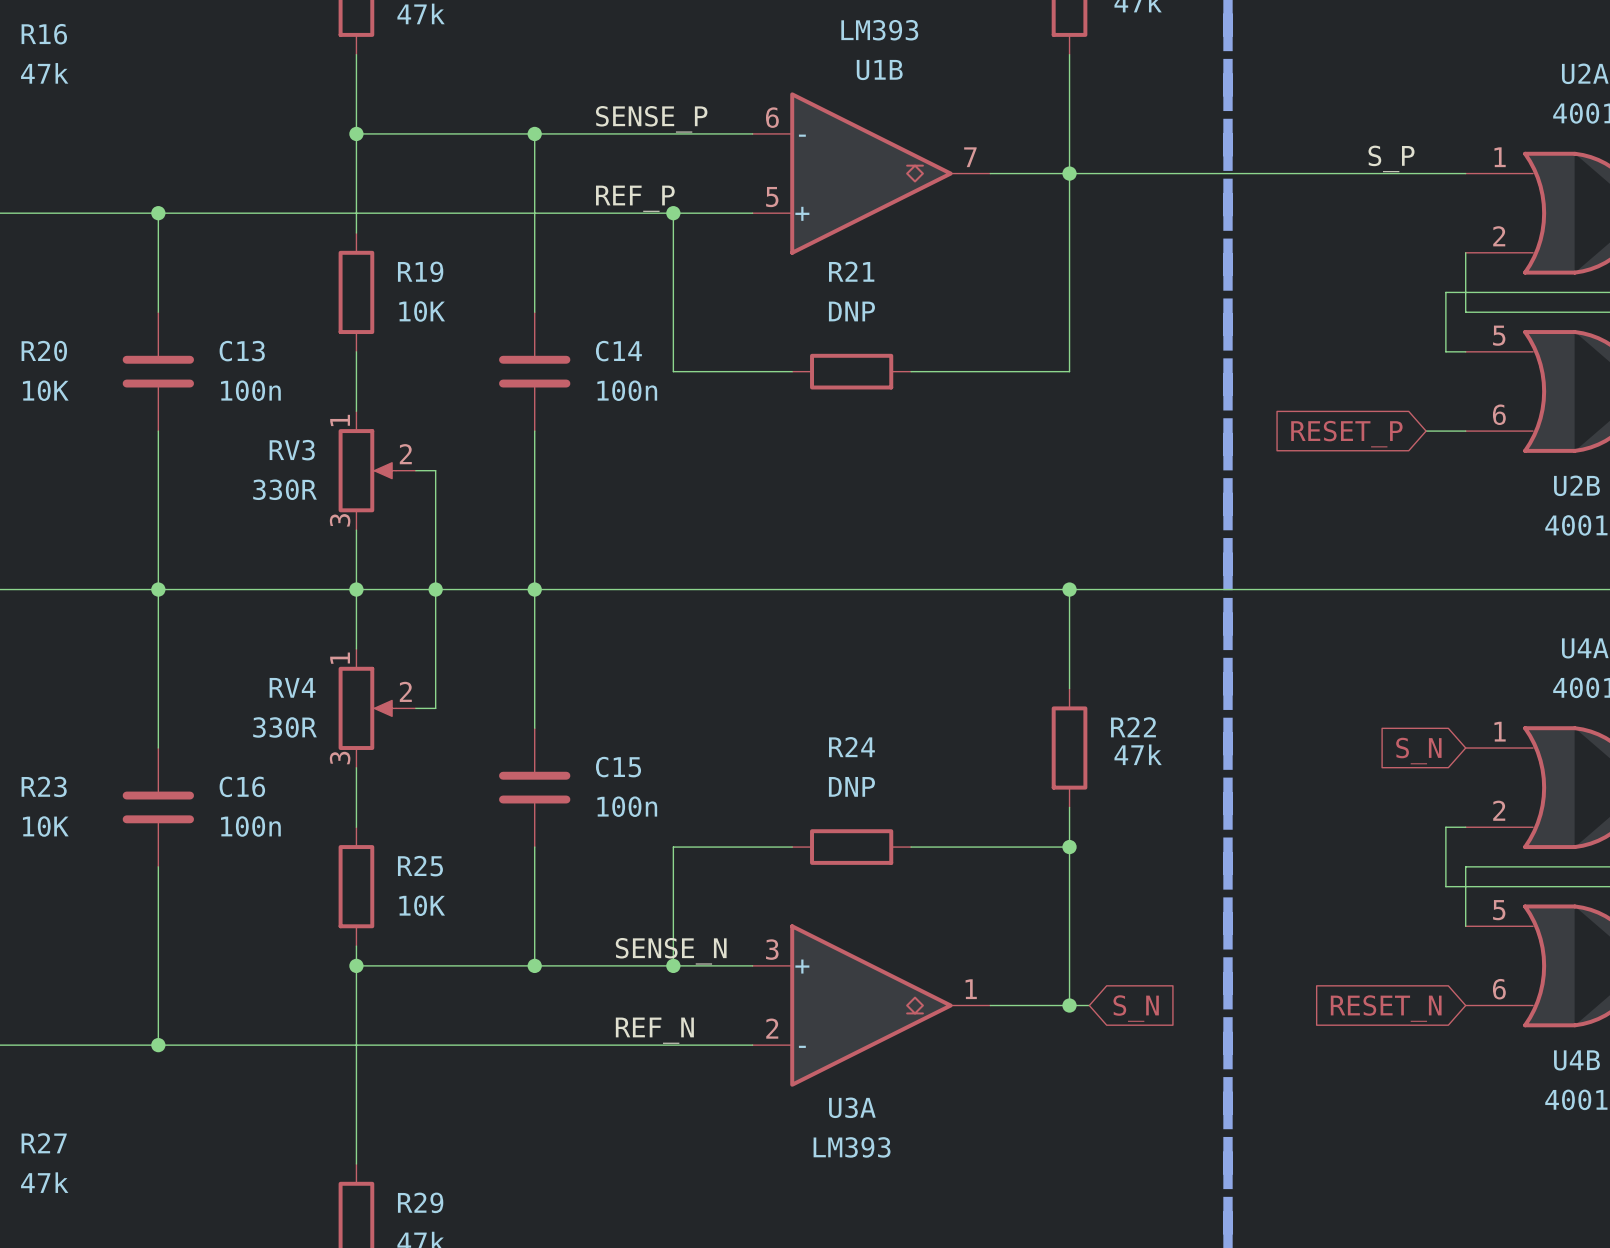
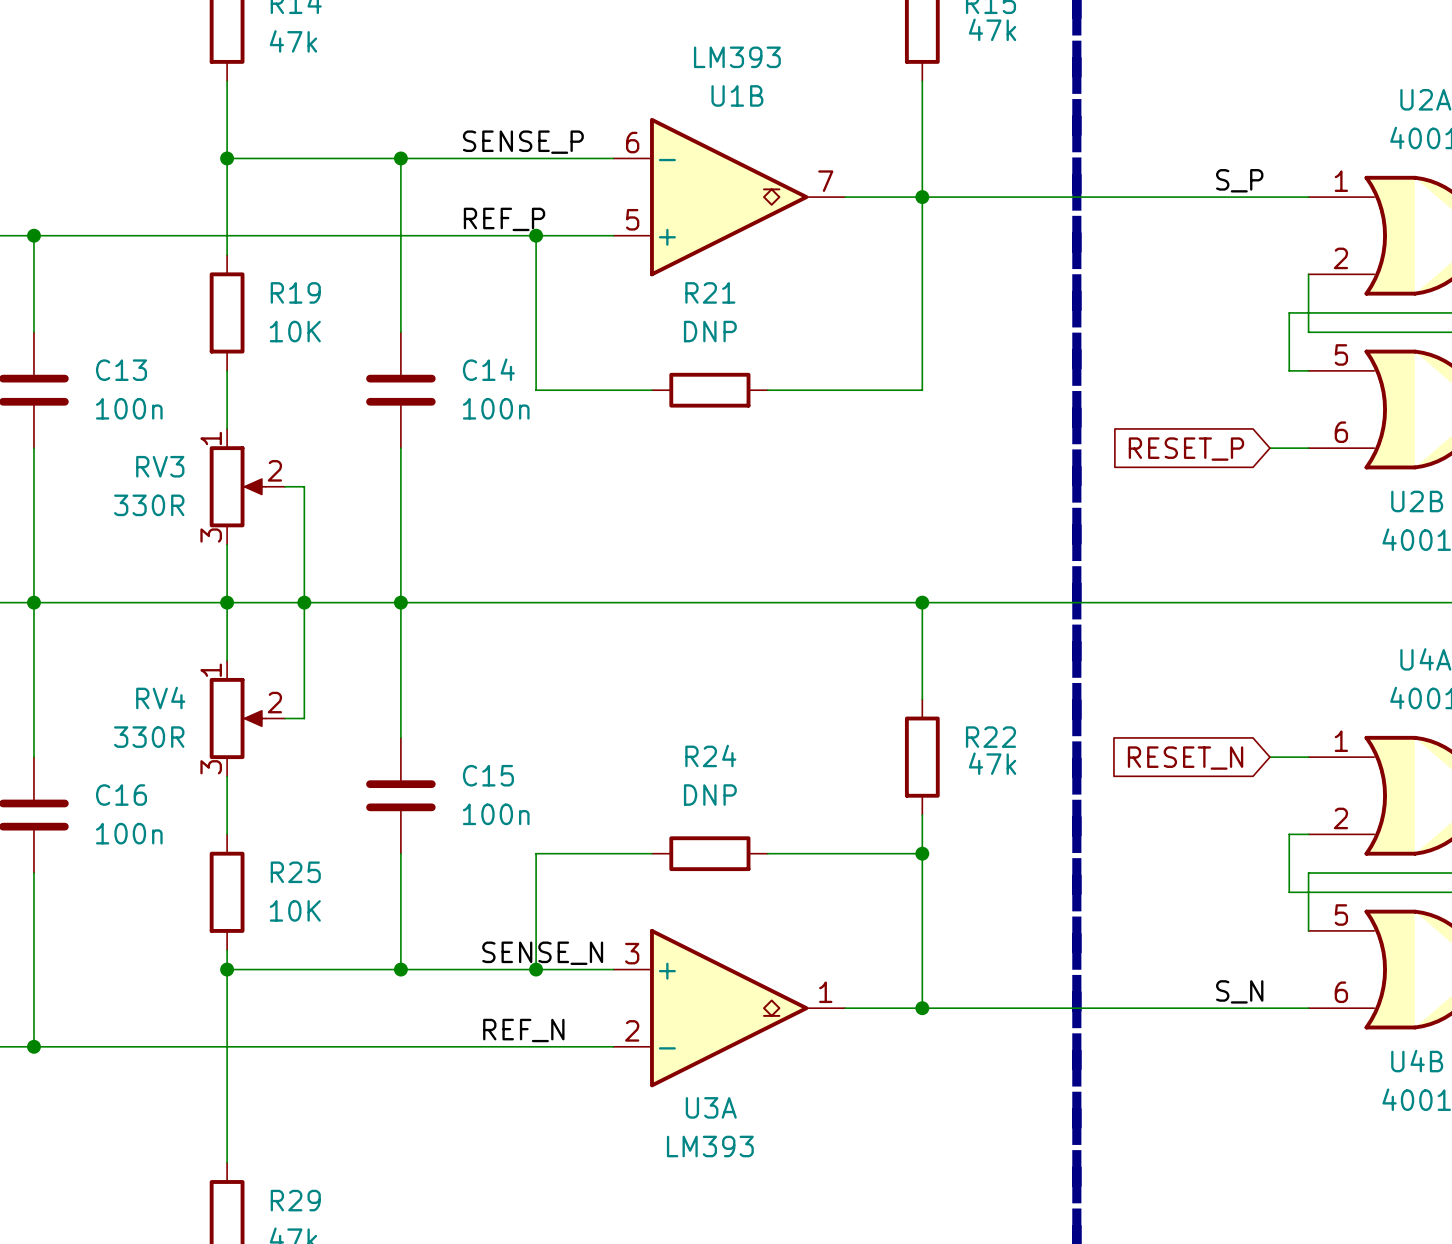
wire: none -> (1269, 757) (1308, 757)
global label: S_N (1418, 751) -> none
label: none -> S_N (1239, 991)
wire: none -> (941, 1008) (1308, 1008)
global label: S_N (1136, 1008) -> none
global label position: RESET_N (1386, 1008) -> RESET_N (1185, 758)

